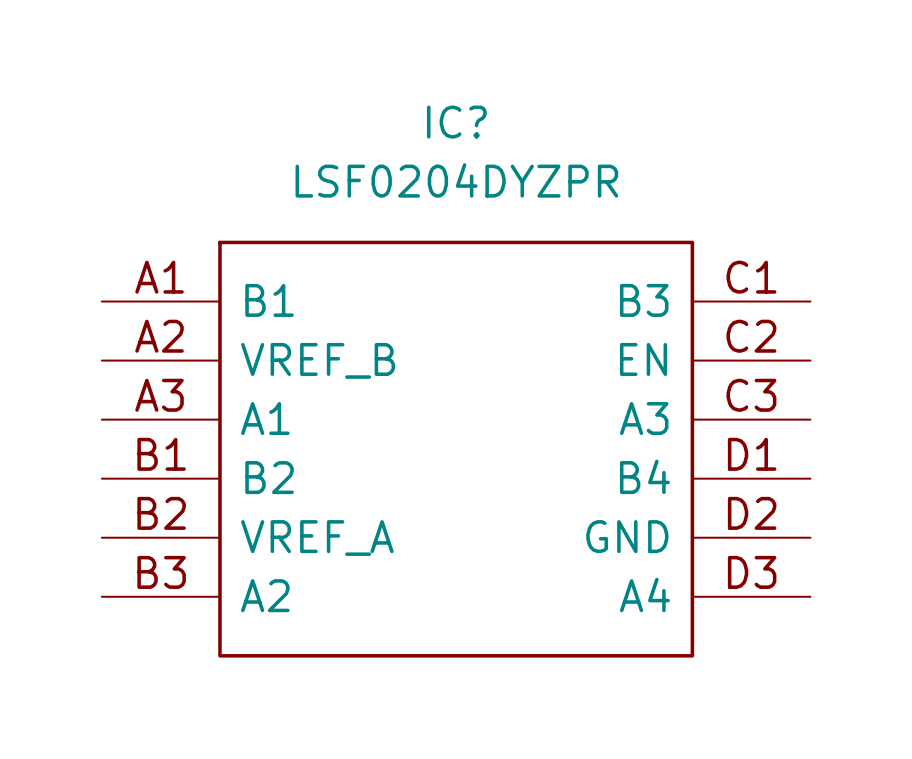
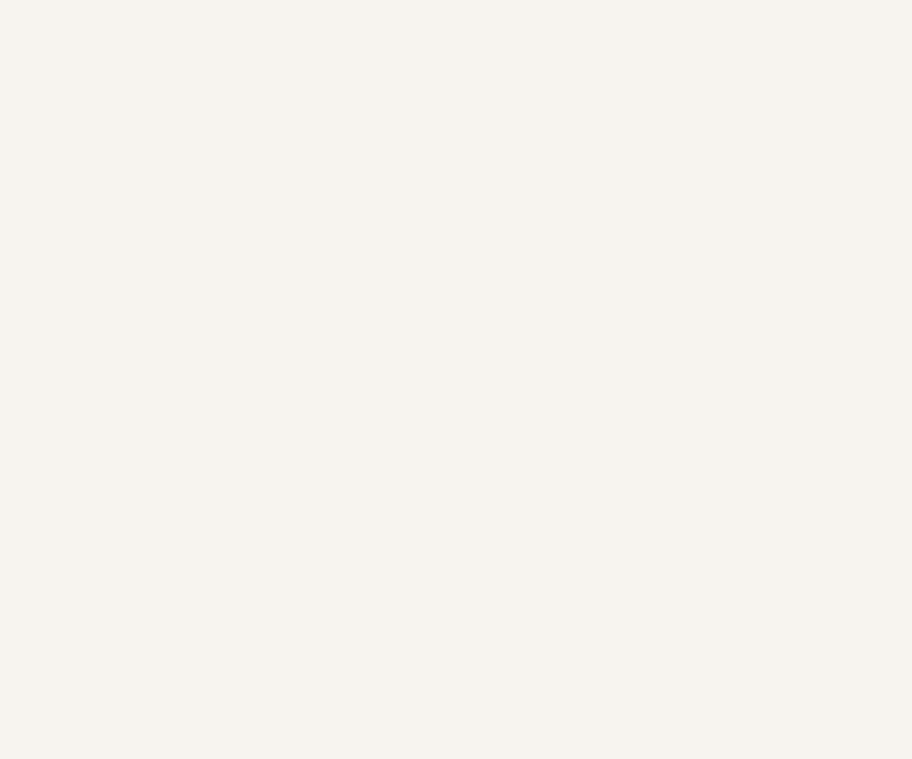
IC?: LSF0204DYZPR (456, 449) -> none

